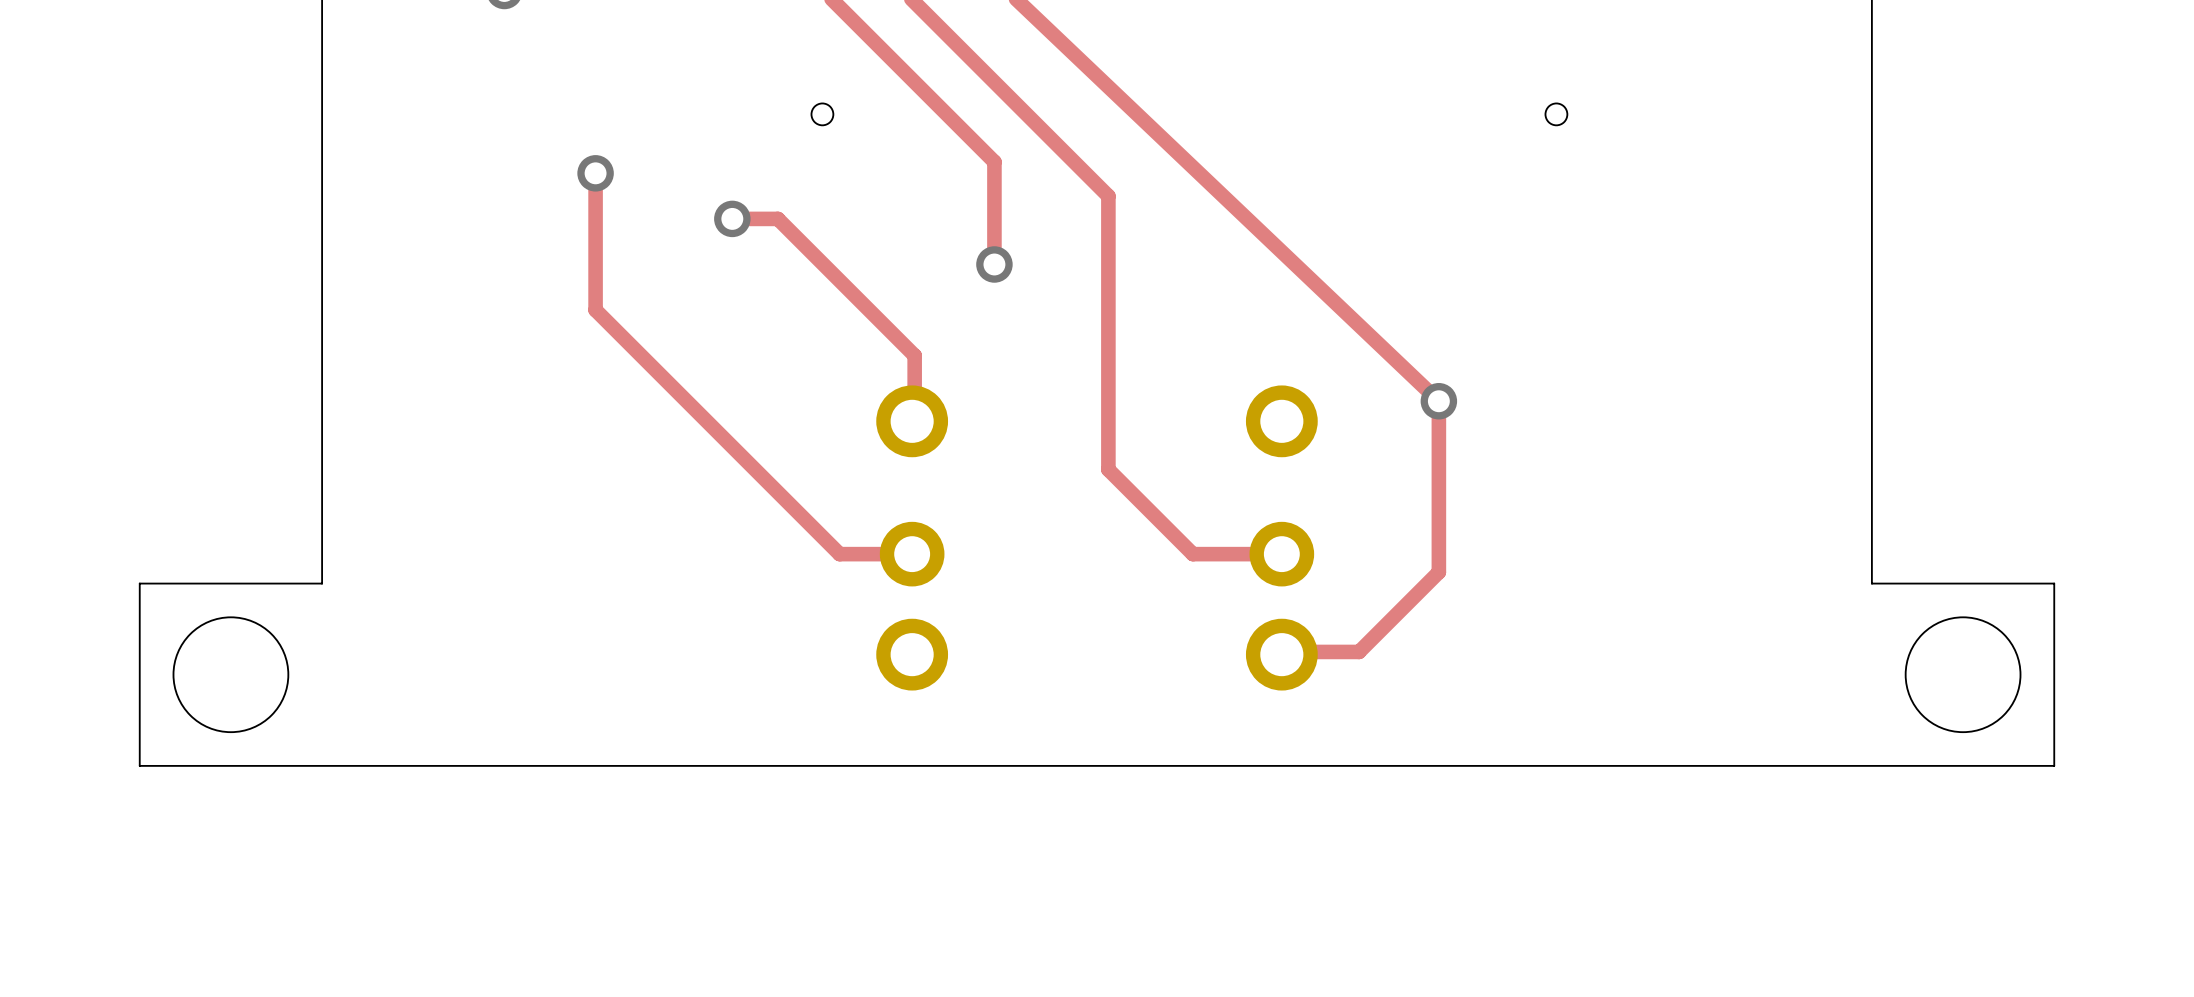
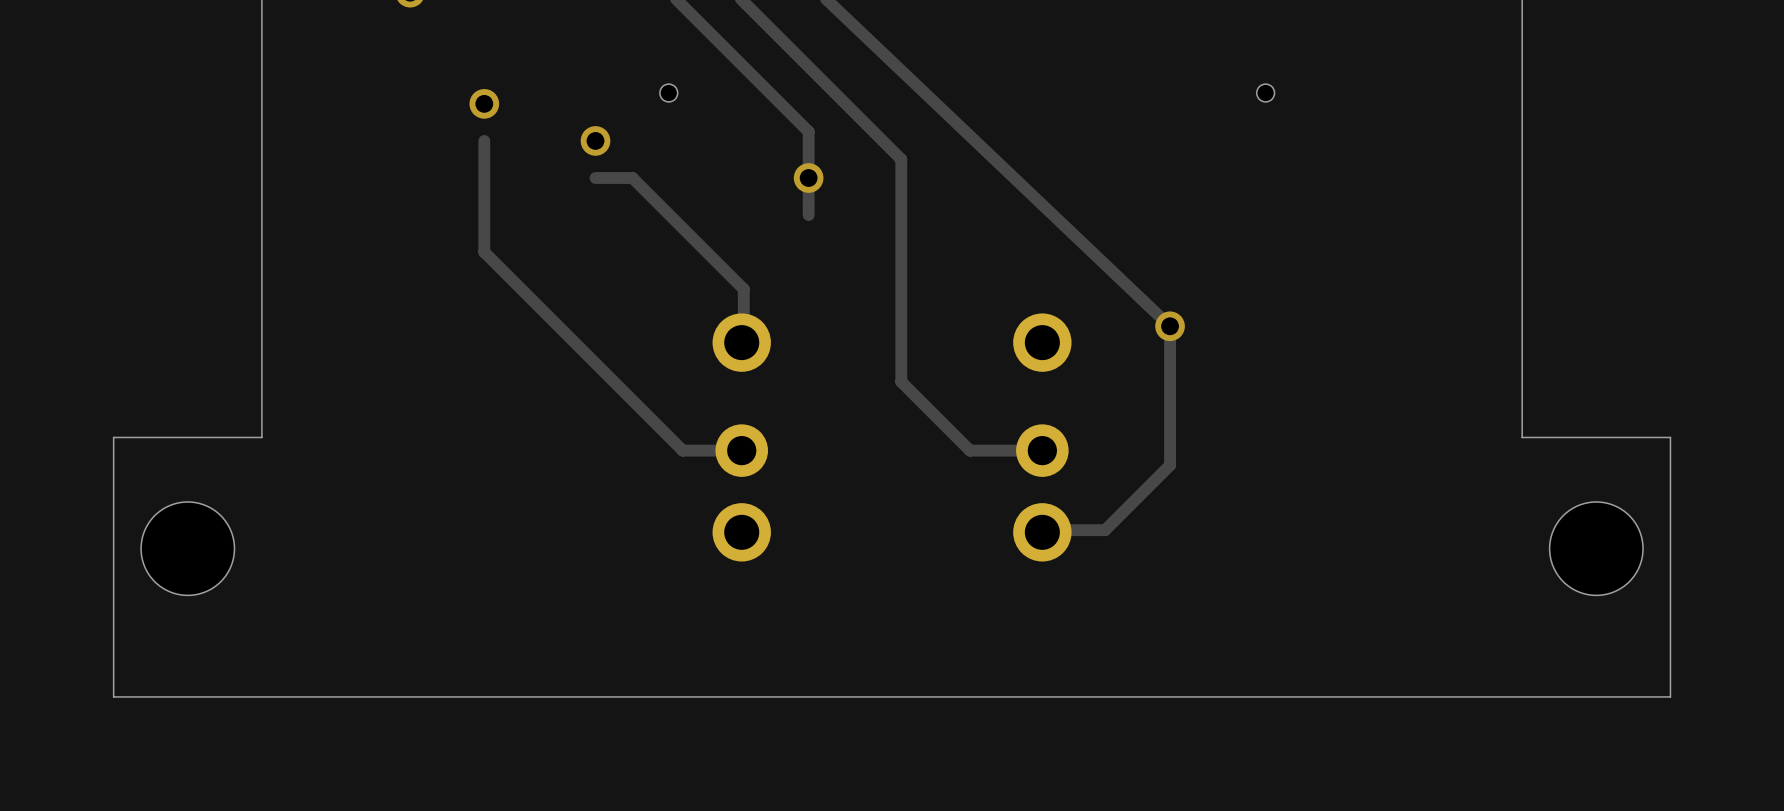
via position: (595, 173) -> (484, 103)
via position: (732, 218) -> (595, 140)
via position: (994, 264) -> (808, 178)
board edge: (322, 537) (322, 583) (139, 583) -> (261, 437) (113, 437) (113, 474)
board edge: (1871, 537) (1871, 583) (2054, 583) -> (1522, 437) (1670, 437) (1670, 474)
board edge: (139, 765) (2054, 765) -> (113, 622) (113, 696) (1670, 696) (1670, 622)

